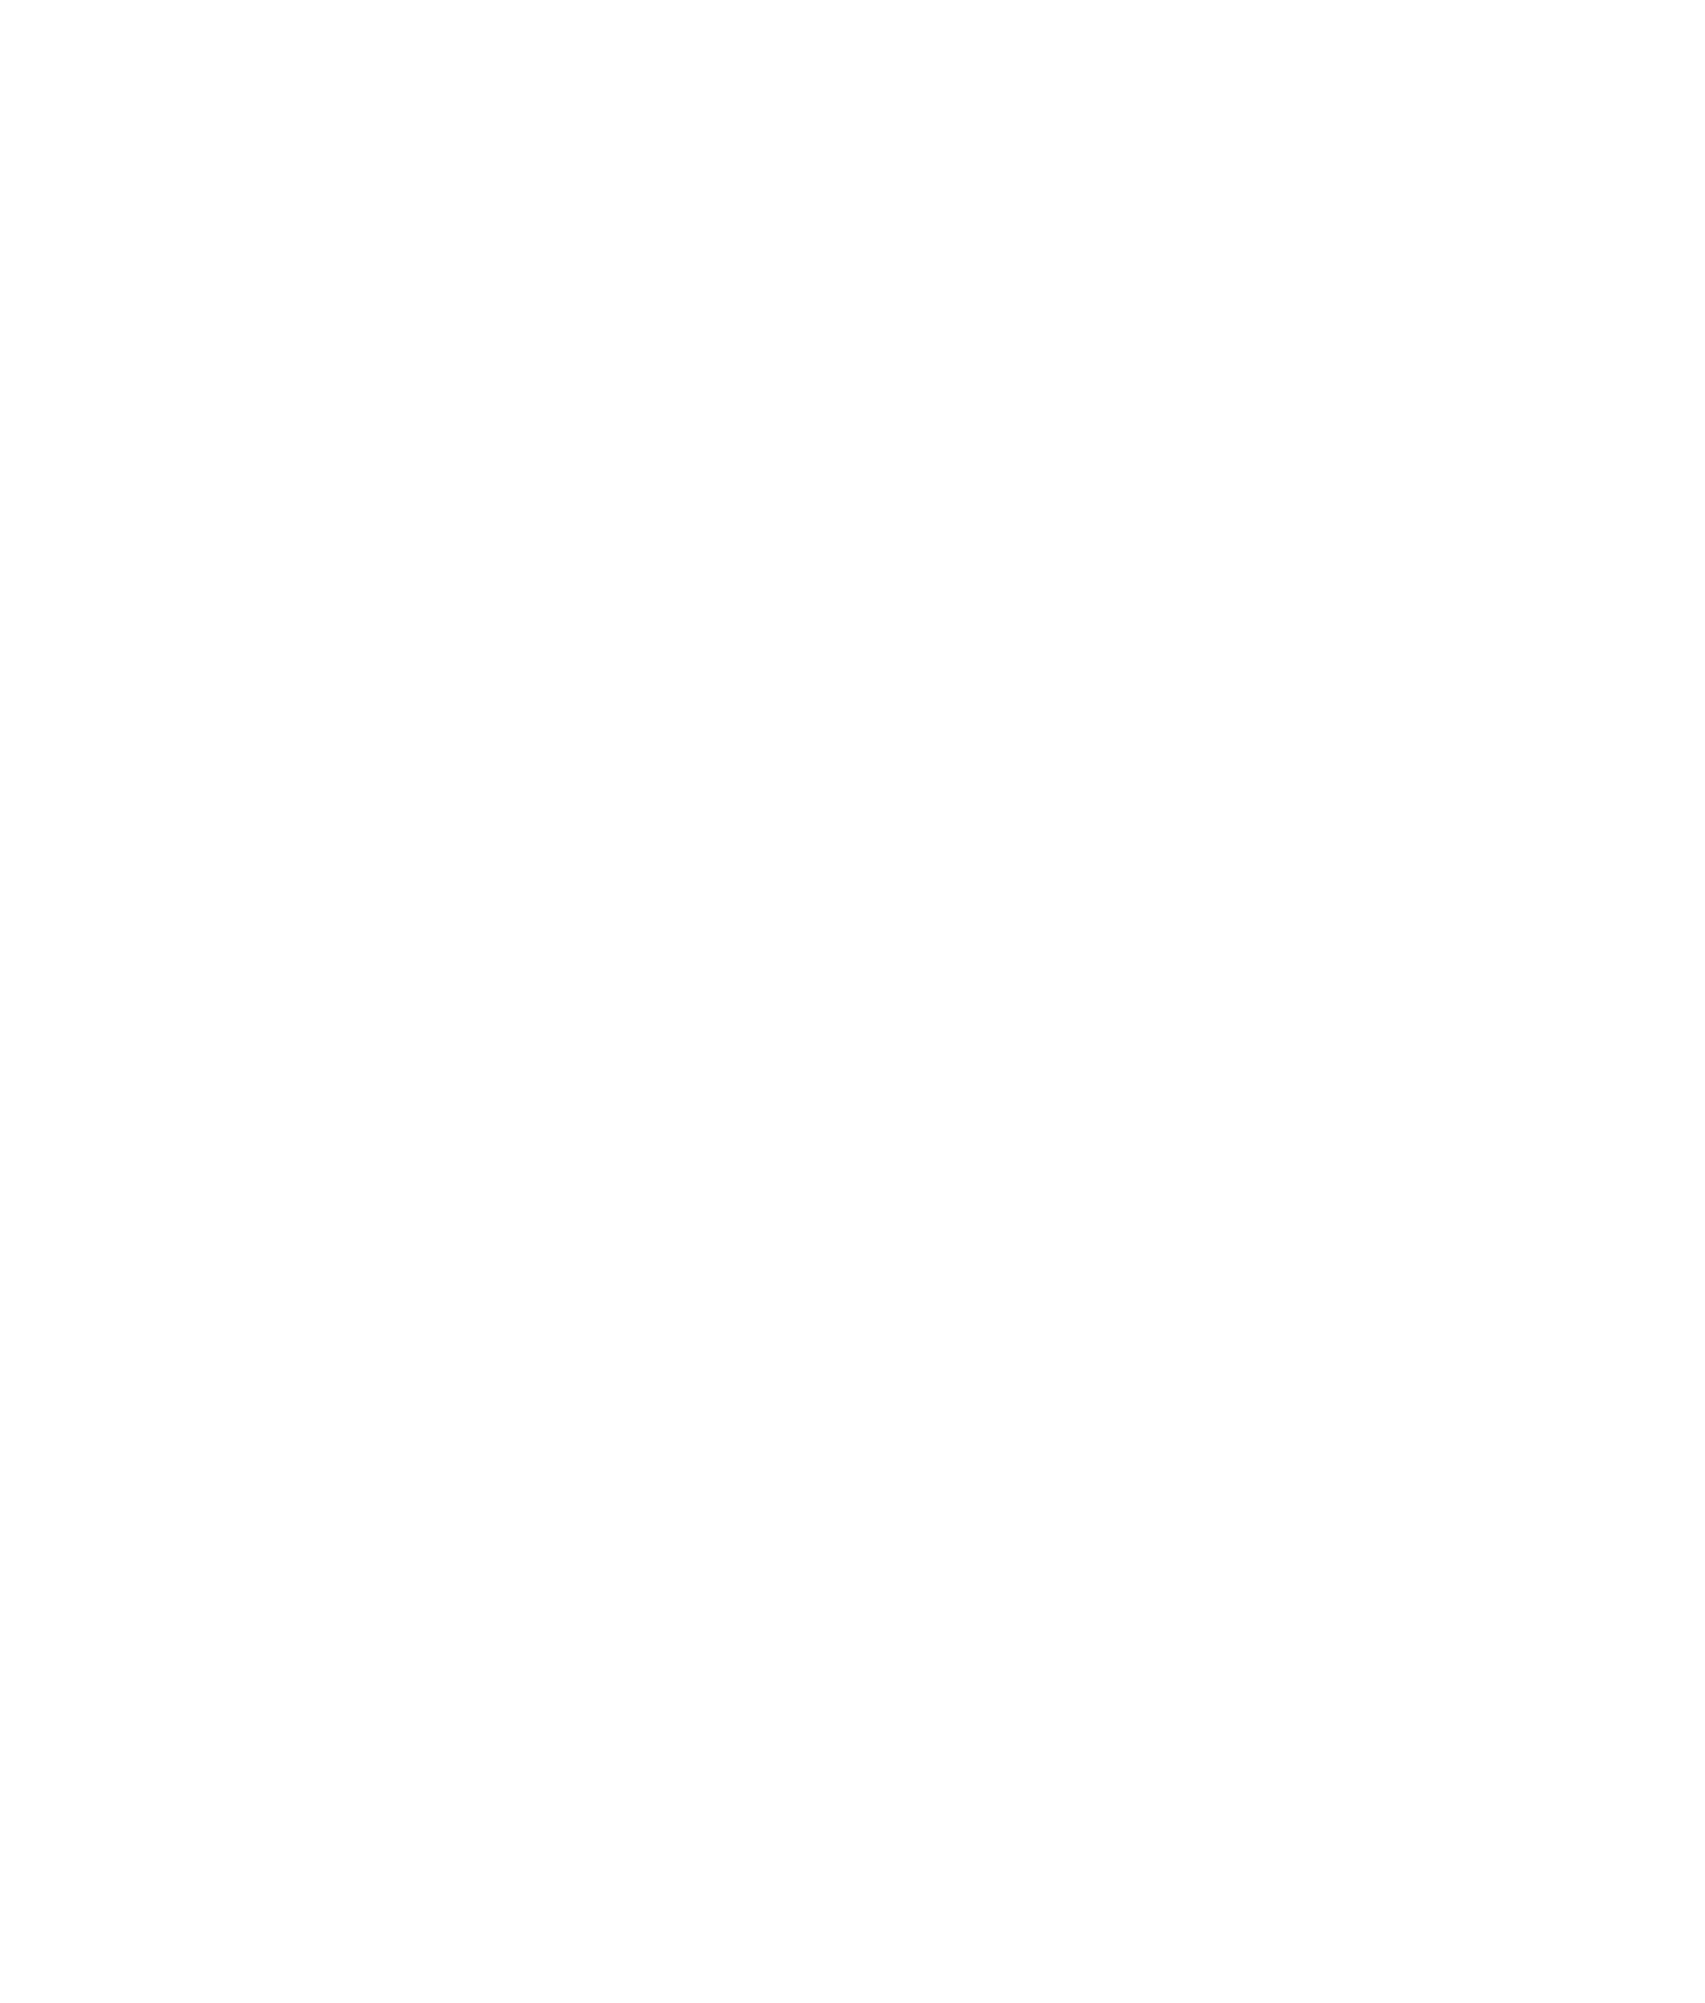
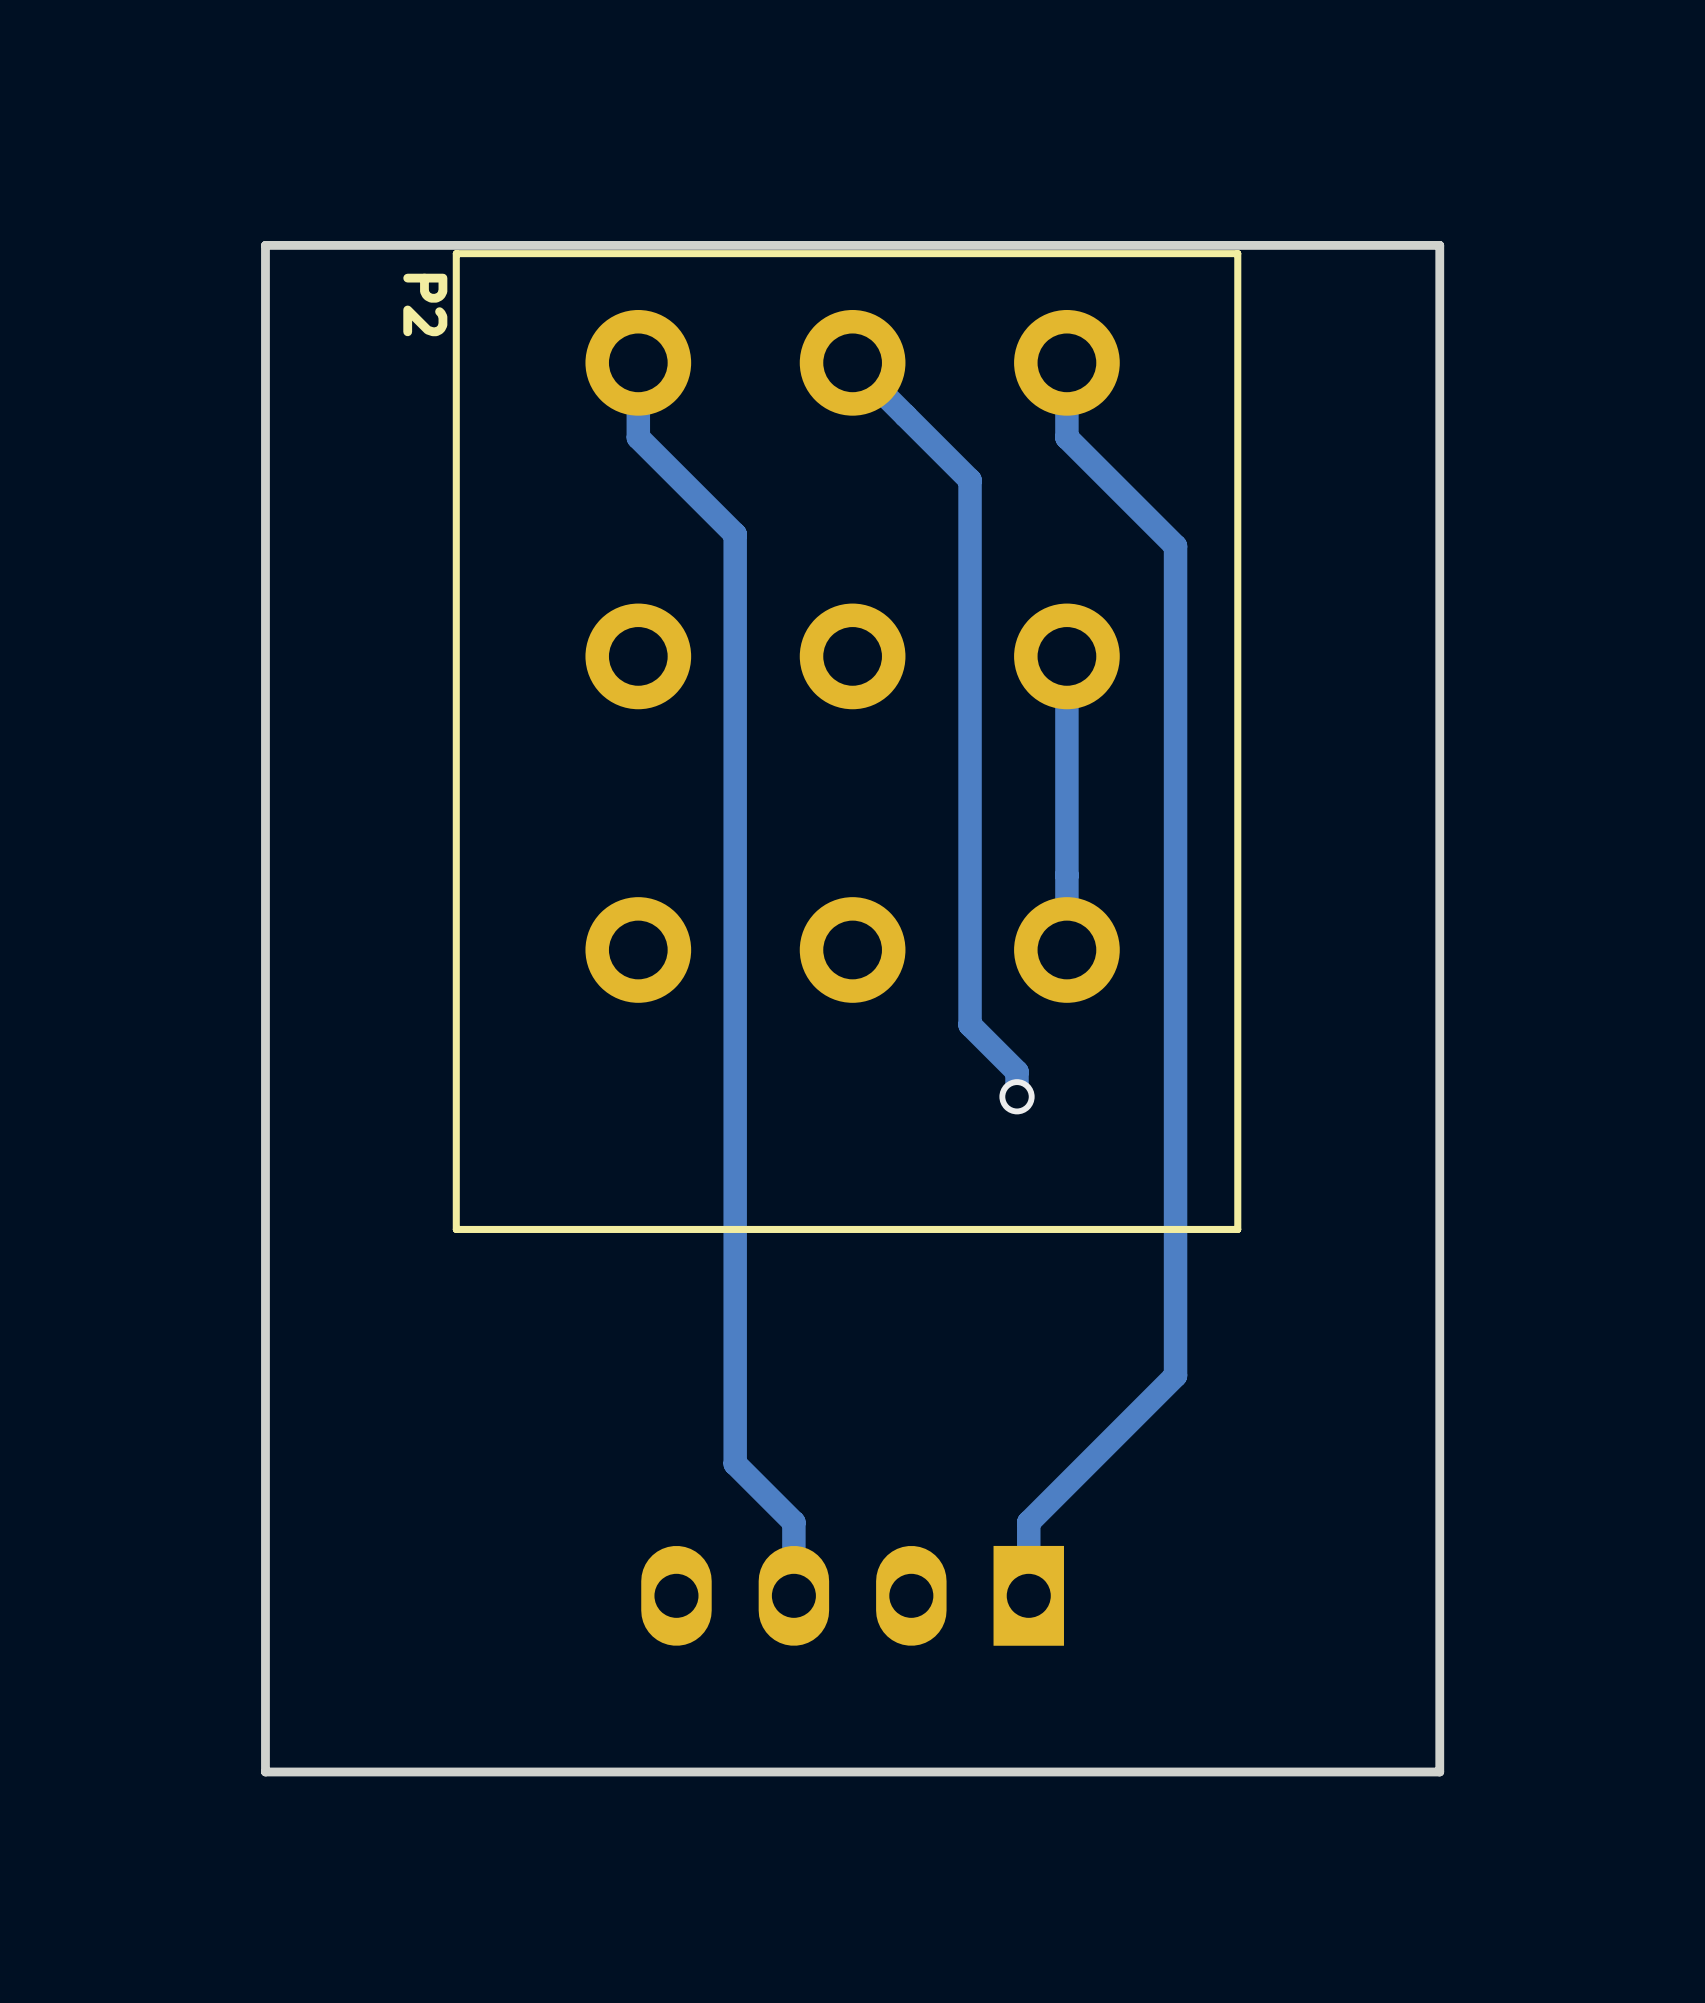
board edge: none -> (1439, 245) (1439, 1771) (265, 1771) (265, 245) (1439, 245)
track: none -> (638, 362) (638, 437) (735, 534) (735, 1463) (793, 1522) (793, 1595)
track: none -> (852, 362) (970, 480) (970, 1024) (1017, 1071) (1017, 1096)
track: none -> (1066, 362) (1066, 437) (1175, 546) (1175, 1375) (1028, 1522) (1028, 1595)
track: none -> (1066, 656) (1066, 949)
P2: none -> (847, 741)
via: none -> (1017, 1096)
part: none -> (852, 1595)

